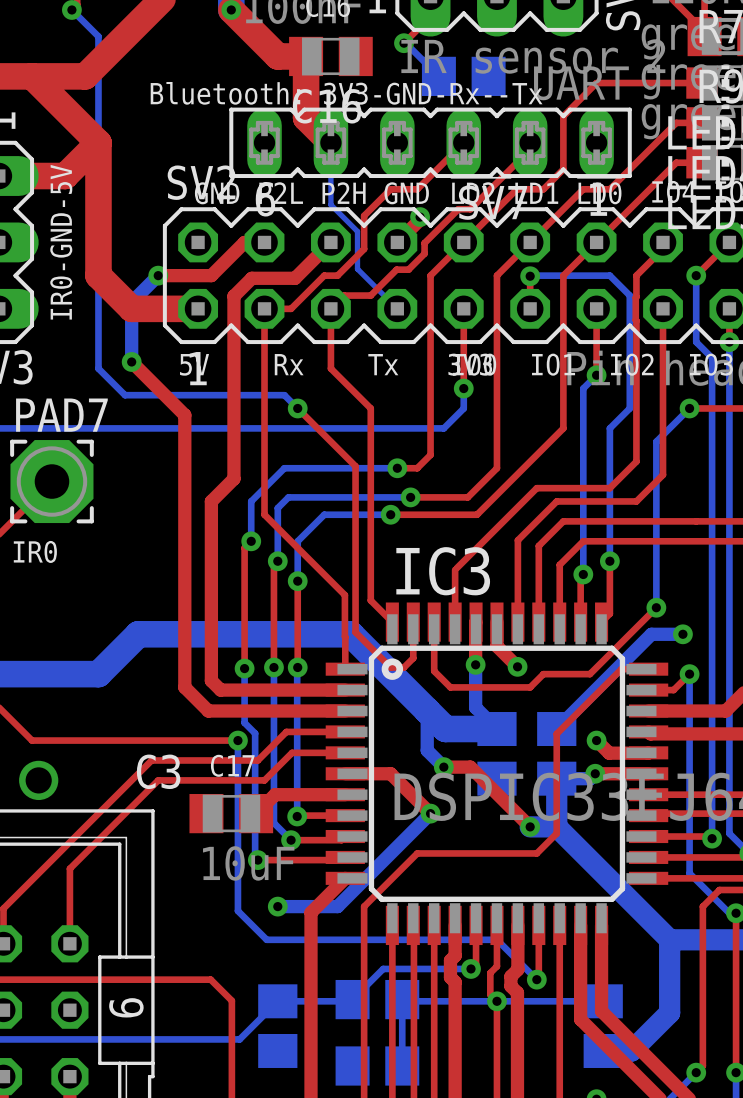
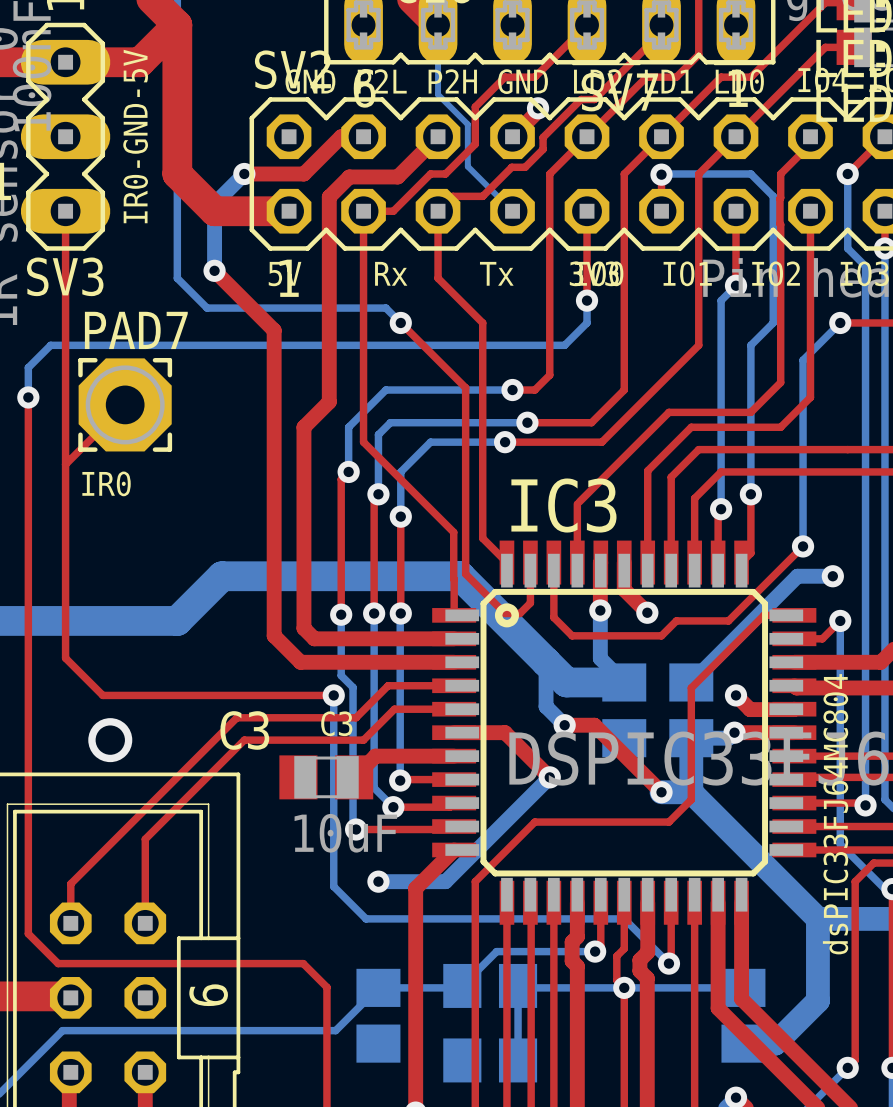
text: C17 (232, 765) -> C3 (336, 723)
text: none -> dsPIC33FJ64MC804 (835, 814)

